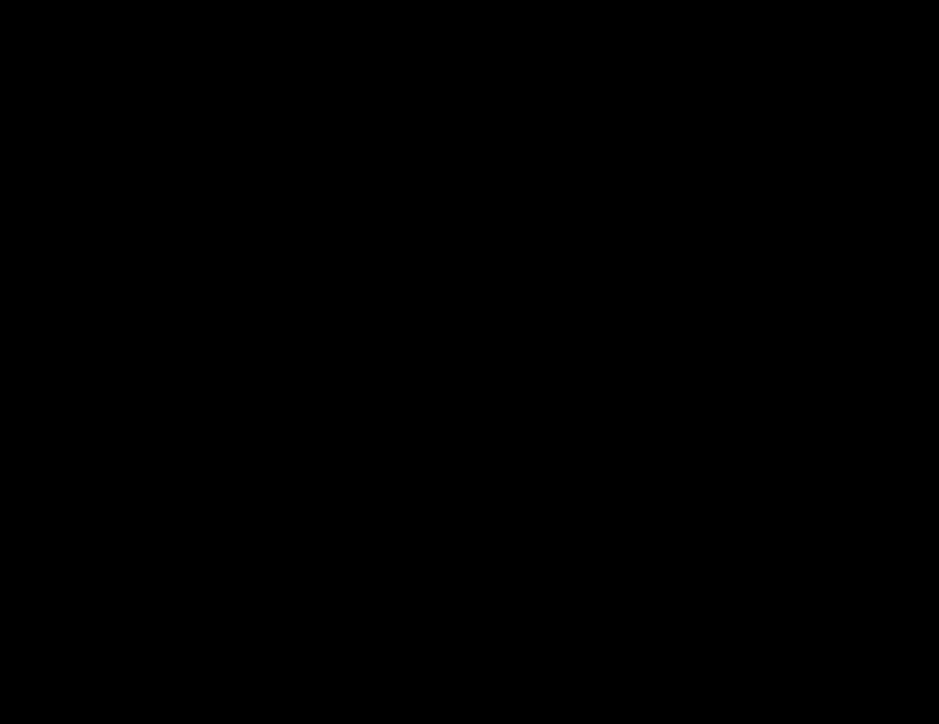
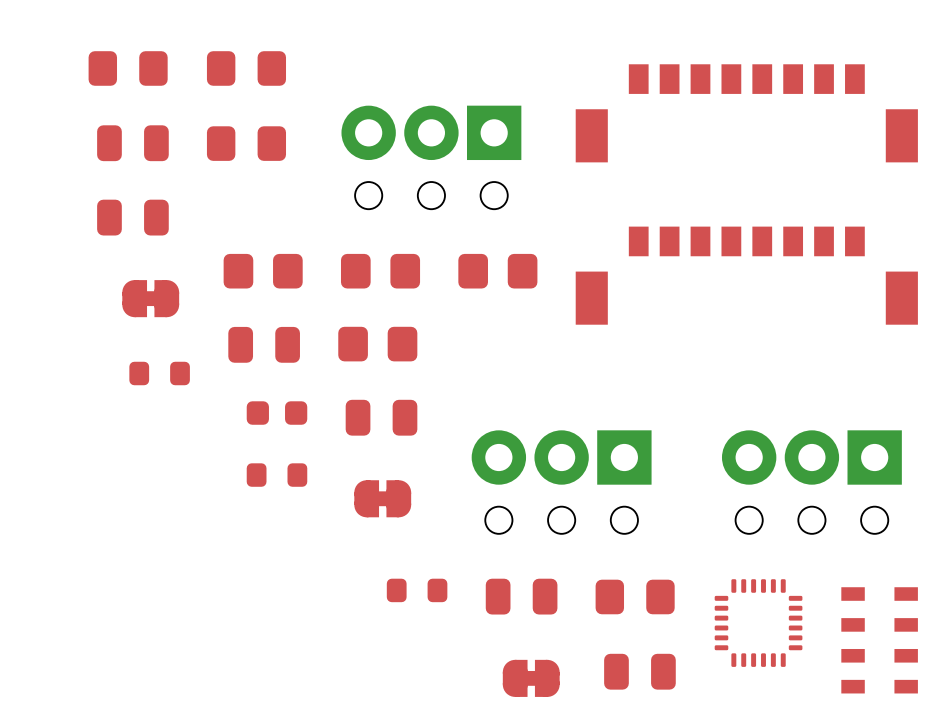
part: none -> (128, 68)
part: none -> (246, 68)
part: none -> (746, 113)
part: none -> (132, 143)
part: none -> (246, 143)
part: none -> (431, 157)
part: none -> (132, 217)
part: none -> (263, 271)
part: none -> (380, 271)
part: none -> (497, 271)
part: none -> (746, 275)
part: none -> (150, 298)
part: none -> (264, 344)
part: none -> (377, 344)
part: none -> (159, 373)
part: none -> (276, 413)
part: none -> (381, 417)
part: none -> (276, 475)
part: none -> (561, 482)
part: none -> (811, 482)
part: none -> (382, 498)
part: none -> (417, 590)
part: none -> (521, 596)
part: none -> (635, 596)
part: none -> (758, 623)
part: none -> (879, 640)
part: none -> (639, 671)
part: none -> (531, 678)

